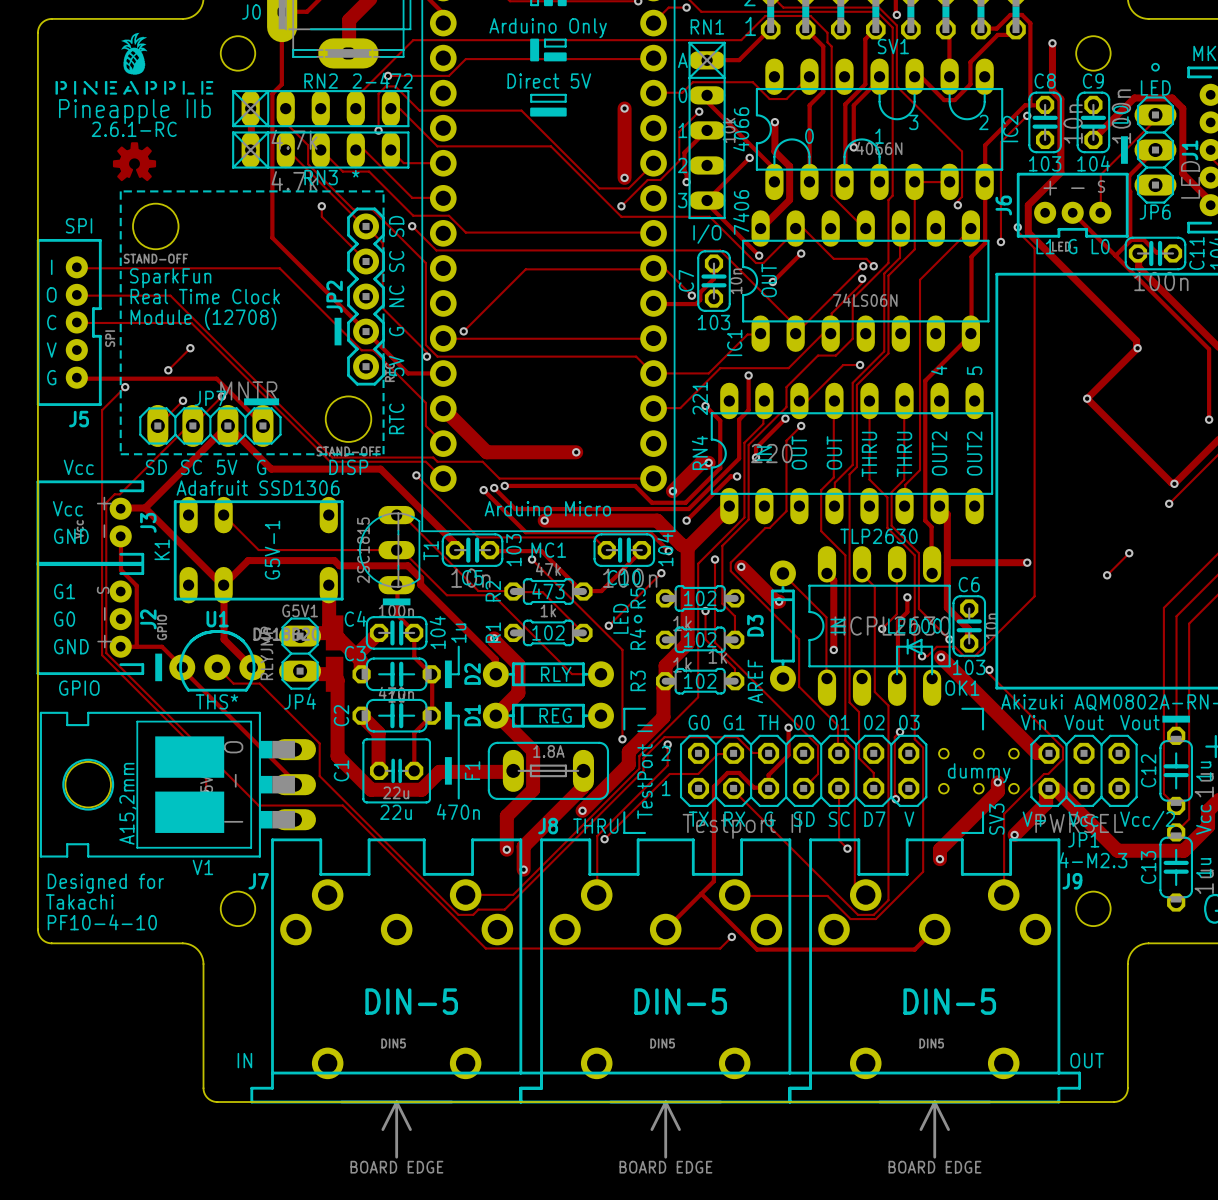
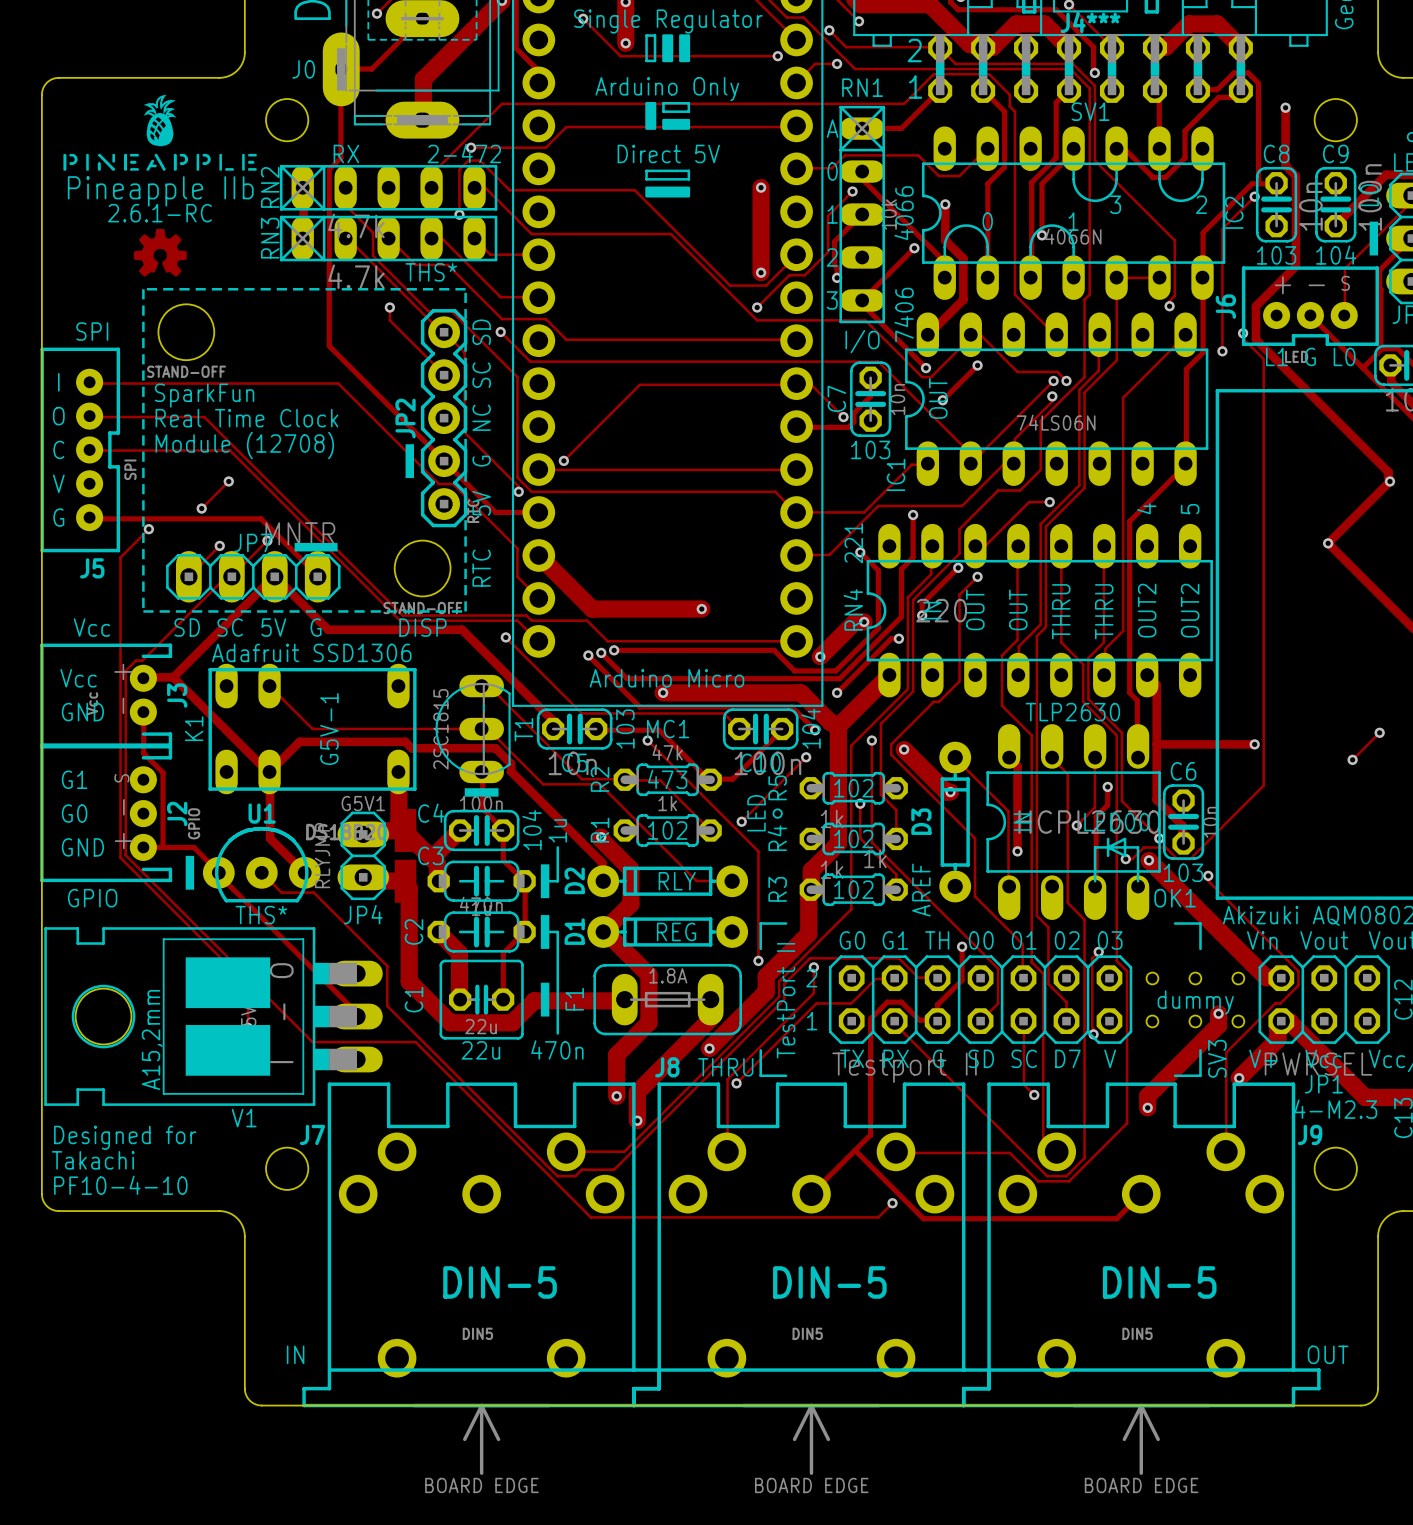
text: none -> RX (346, 153)
RN2 name rotation: 0° (321, 81) -> 90° counterclockwise (270, 187)
RN2 name position: RN2 (321, 81) -> RN2 (270, 187)
text: * (355, 173) -> THS* (431, 272)
RN3 name rotation: 0° (321, 177) -> 90° counterclockwise (270, 238)
RN3 name position: RN3 (321, 177) -> RN3 (270, 238)

